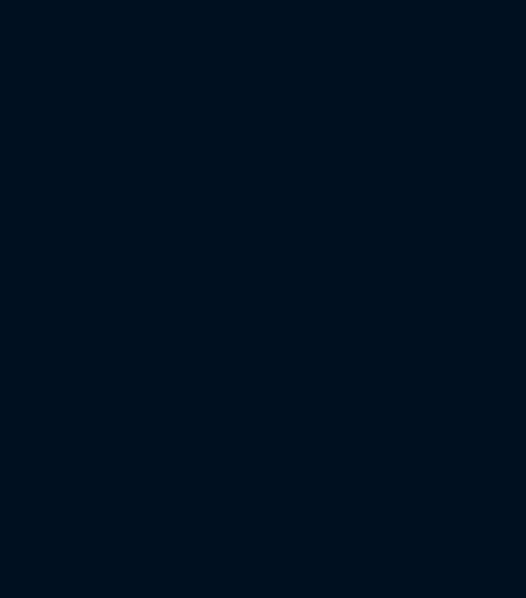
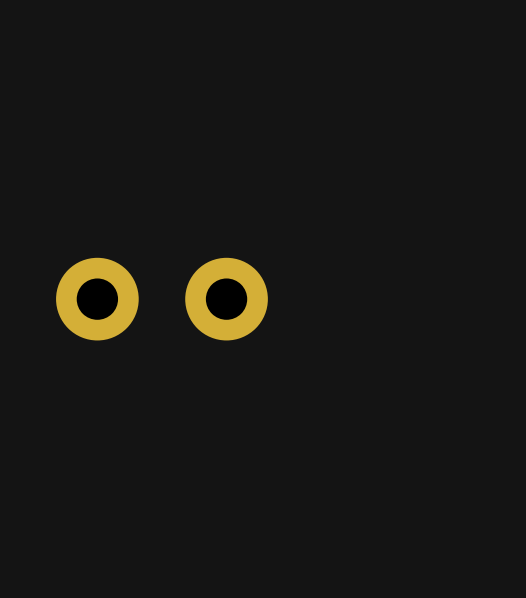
part: none -> (161, 299)

